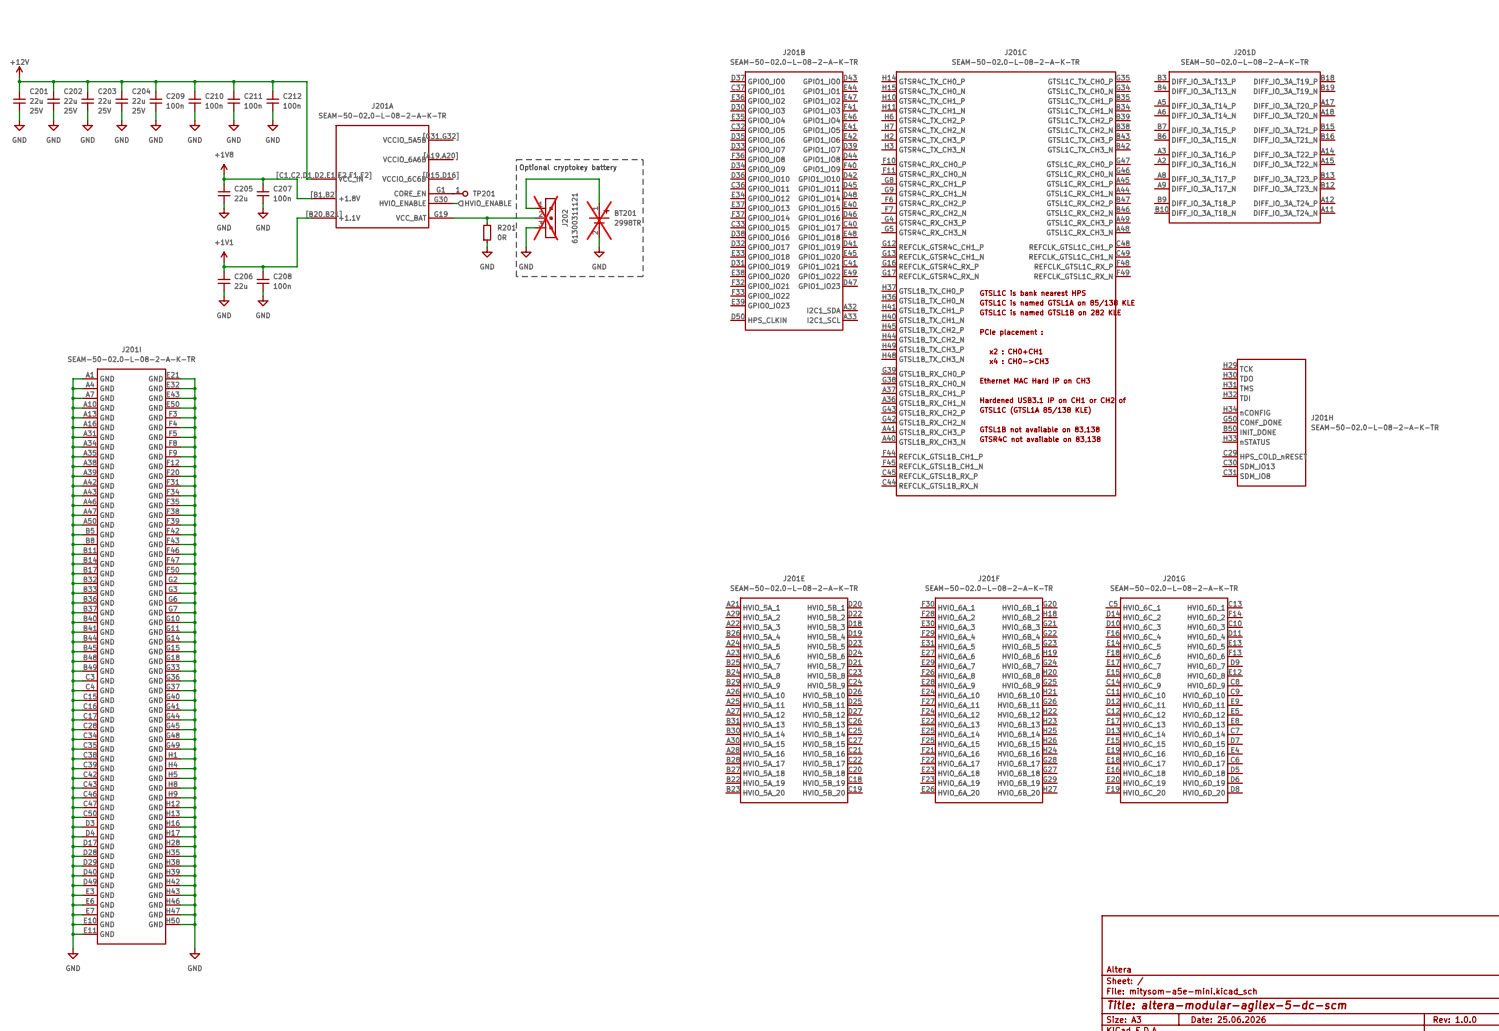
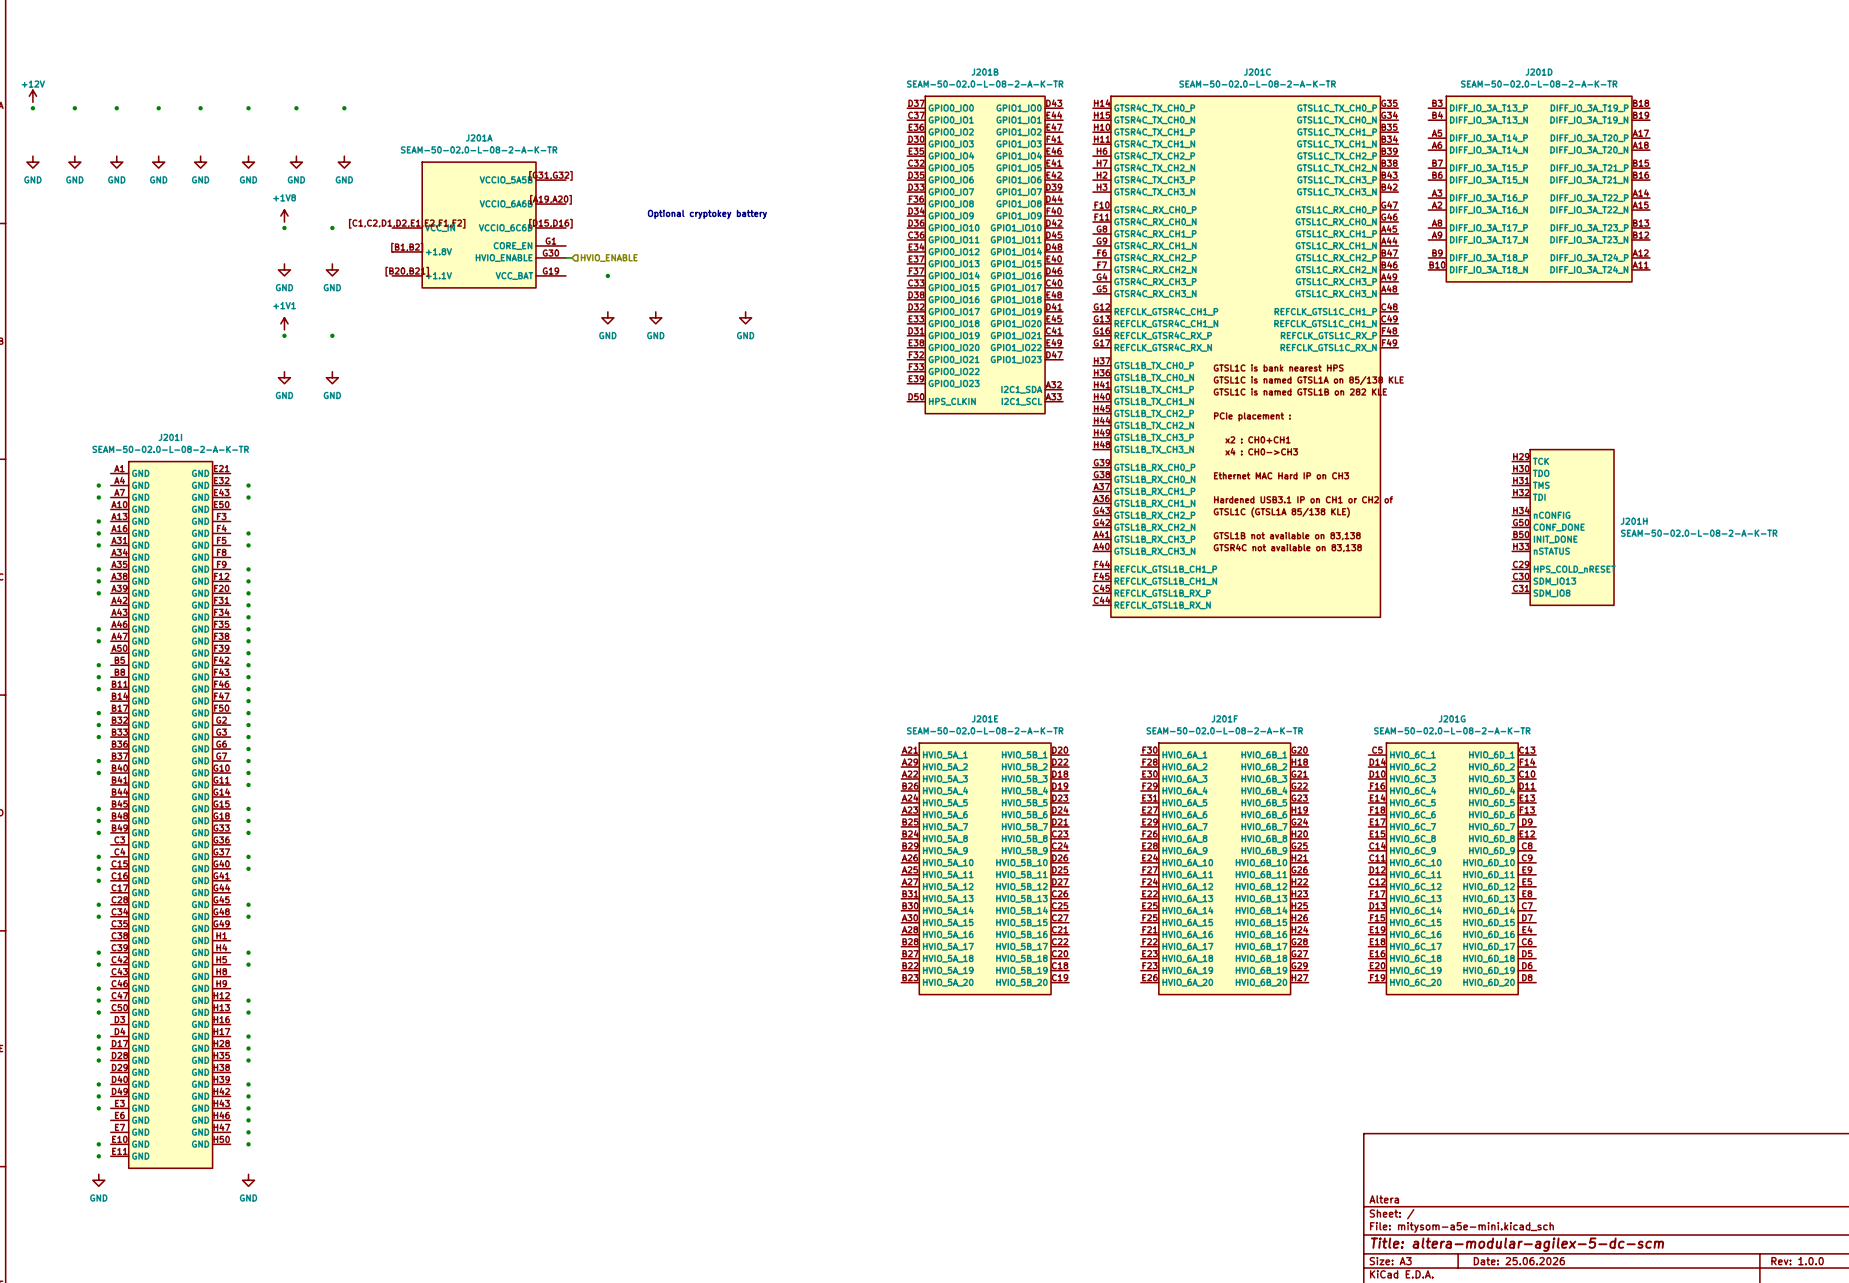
wire: (19, 76) (19, 91) -> none
wire: (19, 81) (306, 81) (306, 179) (311, 179) -> none
wire: (53, 81) (53, 91) -> none
wire: (87, 81) (87, 91) -> none
wire: (121, 81) (121, 91) -> none
wire: (155, 81) (155, 91) -> none
wire: (194, 81) (194, 91) -> none
wire: (233, 81) (233, 91) -> none
wire: (272, 81) (272, 91) -> none
part: (19, 101) -> none
part: (53, 101) -> none
part: (87, 101) -> none
part: (121, 101) -> none
part: (155, 101) -> none
part: (194, 101) -> none
part: (233, 101) -> none
part: (272, 101) -> none
wire: (19, 110) (19, 120) -> none
wire: (53, 110) (53, 120) -> none
wire: (87, 110) (87, 120) -> none
wire: (121, 110) (121, 120) -> none
wire: (155, 110) (155, 120) -> none
wire: (194, 110) (194, 120) -> none
wire: (233, 110) (233, 120) -> none
wire: (272, 110) (272, 120) -> none
line: (516, 159) (643, 159) (643, 276) (516, 276) (516, 159) -> none
wire: (224, 174) (224, 183) -> none
wire: (224, 179) (297, 179) (297, 198) (311, 198) -> none
wire: (263, 179) (263, 183) -> none
part: (224, 193) -> none
part: (263, 193) -> none
part: (460, 193) -> none
wire: (224, 203) (224, 208) -> none
wire: (263, 203) (263, 208) -> none
wire: (599, 203) (599, 179) (526, 179) (526, 208) (535, 208) -> none
wire: (311, 218) (297, 218) (297, 266) (224, 266) -> none
wire: (453, 218) (535, 218) -> none
wire: (487, 218) (487, 222) -> none
part: (545, 218) -> none
part: (599, 220) -> none
wire: (535, 227) (526, 227) (526, 247) -> none
part: (487, 232) -> none
wire: (599, 237) (599, 247) -> none
wire: (487, 242) (487, 247) -> none
wire: (224, 261) (224, 271) -> none
wire: (263, 266) (263, 271) -> none
part: (224, 281) -> none
part: (263, 281) -> none
wire: (224, 291) (224, 296) -> none
wire: (263, 291) (263, 296) -> none
wire: (82, 378) (73, 378) (73, 948) -> none
wire: (180, 378) (194, 378) (194, 948) -> none
wire: (73, 388) (82, 388) -> none
wire: (180, 388) (194, 388) -> none
wire: (73, 398) (82, 398) -> none
wire: (180, 398) (194, 398) -> none
wire: (73, 408) (82, 408) -> none
junction: (73, 408) -> none
wire: (180, 408) (194, 408) -> none
junction: (194, 408) -> none
wire: (73, 417) (82, 417) -> none
wire: (180, 417) (194, 417) -> none
junction: (194, 417) -> none
wire: (73, 427) (82, 427) -> none
wire: (180, 427) (194, 427) -> none
wire: (73, 437) (82, 437) -> none
wire: (180, 437) (194, 437) -> none
wire: (73, 447) (82, 447) -> none
junction: (73, 447) -> none
wire: (180, 447) (194, 447) -> none
junction: (194, 447) -> none
wire: (73, 456) (82, 456) -> none
wire: (180, 456) (194, 456) -> none
wire: (73, 466) (82, 466) -> none
wire: (180, 466) (194, 466) -> none
wire: (73, 476) (82, 476) -> none
wire: (180, 476) (194, 476) -> none
wire: (73, 486) (82, 486) -> none
junction: (73, 486) -> none
wire: (180, 486) (194, 486) -> none
wire: (73, 495) (82, 495) -> none
junction: (73, 495) -> none
wire: (180, 495) (194, 495) -> none
wire: (73, 505) (82, 505) -> none
wire: (180, 505) (194, 505) -> none
wire: (73, 515) (82, 515) -> none
wire: (180, 515) (194, 515) -> none
wire: (73, 525) (82, 525) -> none
junction: (73, 525) -> none
wire: (180, 525) (194, 525) -> none
wire: (73, 534) (82, 534) -> none
wire: (180, 534) (194, 534) -> none
wire: (73, 544) (82, 544) -> none
wire: (180, 544) (194, 544) -> none
wire: (73, 554) (82, 554) -> none
wire: (180, 554) (194, 554) -> none
wire: (73, 563) (82, 563) -> none
junction: (73, 563) -> none
wire: (180, 563) (194, 563) -> none
wire: (73, 573) (82, 573) -> none
wire: (180, 573) (194, 573) -> none
wire: (73, 583) (82, 583) -> none
wire: (180, 583) (194, 583) -> none
wire: (73, 593) (82, 593) -> none
wire: (180, 593) (194, 593) -> none
wire: (73, 602) (82, 602) -> none
junction: (73, 602) -> none
wire: (180, 602) (194, 602) -> none
wire: (73, 612) (82, 612) -> none
wire: (180, 612) (194, 612) -> none
wire: (73, 622) (82, 622) -> none
wire: (180, 622) (194, 622) -> none
wire: (73, 632) (82, 632) -> none
junction: (73, 632) -> none
wire: (180, 632) (194, 632) -> none
wire: (73, 641) (82, 641) -> none
junction: (73, 641) -> none
wire: (180, 641) (194, 641) -> none
junction: (194, 641) -> none
wire: (73, 651) (82, 651) -> none
wire: (180, 651) (194, 651) -> none
wire: (73, 661) (82, 661) -> none
wire: (180, 661) (194, 661) -> none
wire: (73, 671) (82, 671) -> none
wire: (180, 671) (194, 671) -> none
wire: (73, 680) (82, 680) -> none
junction: (73, 680) -> none
wire: (180, 680) (194, 680) -> none
junction: (194, 680) -> none
wire: (73, 690) (82, 690) -> none
wire: (180, 690) (194, 690) -> none
wire: (73, 700) (82, 700) -> none
wire: (180, 700) (194, 700) -> none
wire: (73, 710) (82, 710) -> none
wire: (180, 710) (194, 710) -> none
junction: (194, 710) -> none
wire: (73, 719) (82, 719) -> none
junction: (73, 719) -> none
wire: (180, 719) (194, 719) -> none
junction: (194, 719) -> none
wire: (73, 729) (82, 729) -> none
wire: (180, 729) (194, 729) -> none
wire: (73, 739) (82, 739) -> none
wire: (180, 739) (194, 739) -> none
wire: (73, 749) (82, 749) -> none
junction: (73, 749) -> none
wire: (180, 749) (194, 749) -> none
junction: (194, 749) -> none
wire: (73, 758) (82, 758) -> none
junction: (73, 758) -> none
wire: (180, 758) (194, 758) -> none
junction: (194, 758) -> none
wire: (73, 768) (82, 768) -> none
wire: (180, 768) (194, 768) -> none
wire: (73, 778) (82, 778) -> none
wire: (180, 778) (194, 778) -> none
wire: (73, 788) (82, 788) -> none
junction: (73, 788) -> none
wire: (180, 788) (194, 788) -> none
junction: (194, 788) -> none
wire: (73, 797) (82, 797) -> none
wire: (180, 797) (194, 797) -> none
junction: (194, 797) -> none
wire: (73, 807) (82, 807) -> none
wire: (180, 807) (194, 807) -> none
wire: (73, 817) (82, 817) -> none
wire: (180, 817) (194, 817) -> none
wire: (73, 827) (82, 827) -> none
junction: (73, 827) -> none
wire: (180, 827) (194, 827) -> none
junction: (194, 827) -> none
wire: (73, 836) (82, 836) -> none
wire: (180, 836) (194, 836) -> none
wire: (73, 846) (82, 846) -> none
wire: (180, 846) (194, 846) -> none
wire: (73, 856) (82, 856) -> none
wire: (180, 856) (194, 856) -> none
wire: (73, 866) (82, 866) -> none
junction: (73, 866) -> none
wire: (180, 866) (194, 866) -> none
junction: (194, 866) -> none
wire: (73, 875) (82, 875) -> none
wire: (180, 875) (194, 875) -> none
wire: (73, 885) (82, 885) -> none
wire: (180, 885) (194, 885) -> none
wire: (73, 895) (82, 895) -> none
wire: (180, 895) (194, 895) -> none
wire: (73, 905) (82, 905) -> none
junction: (73, 905) -> none
wire: (180, 905) (194, 905) -> none
wire: (73, 914) (82, 914) -> none
junction: (73, 914) -> none
wire: (180, 914) (194, 914) -> none
wire: (73, 924) (82, 924) -> none
wire: (180, 924) (194, 924) -> none
wire: (73, 934) (82, 934) -> none

